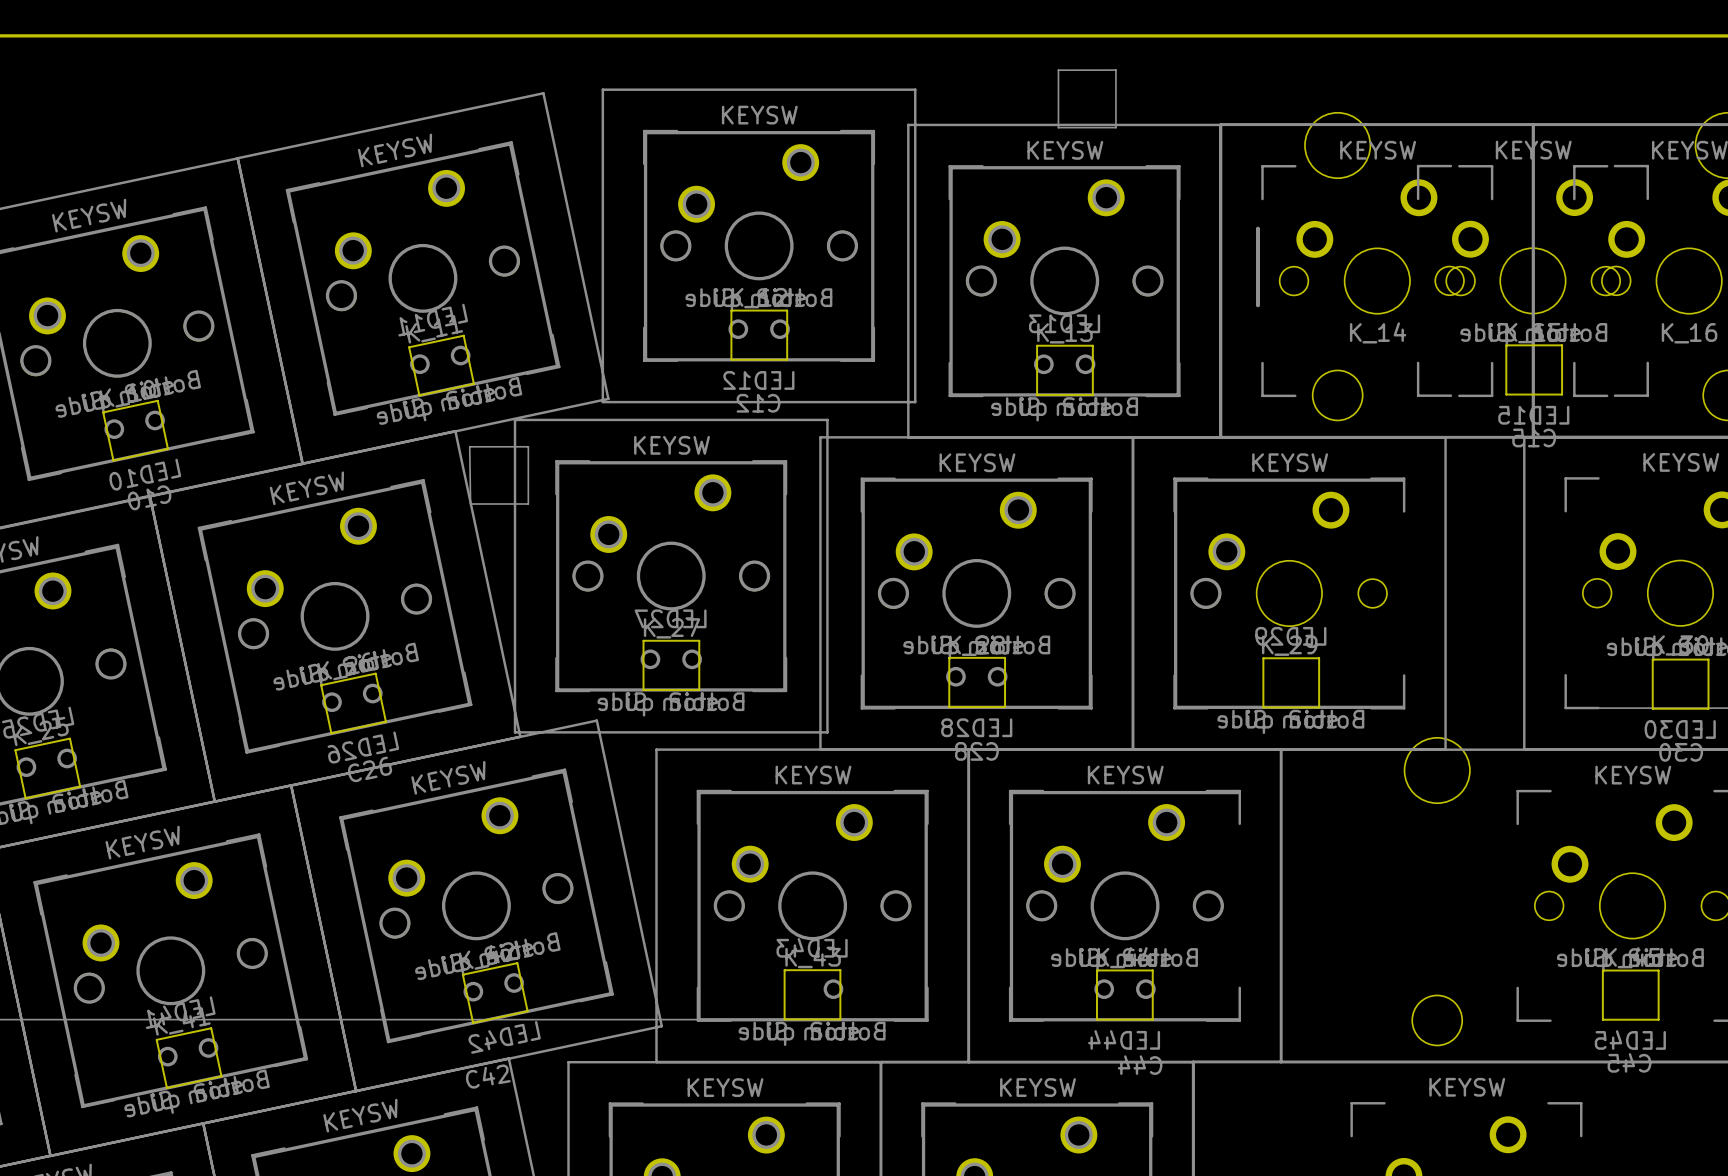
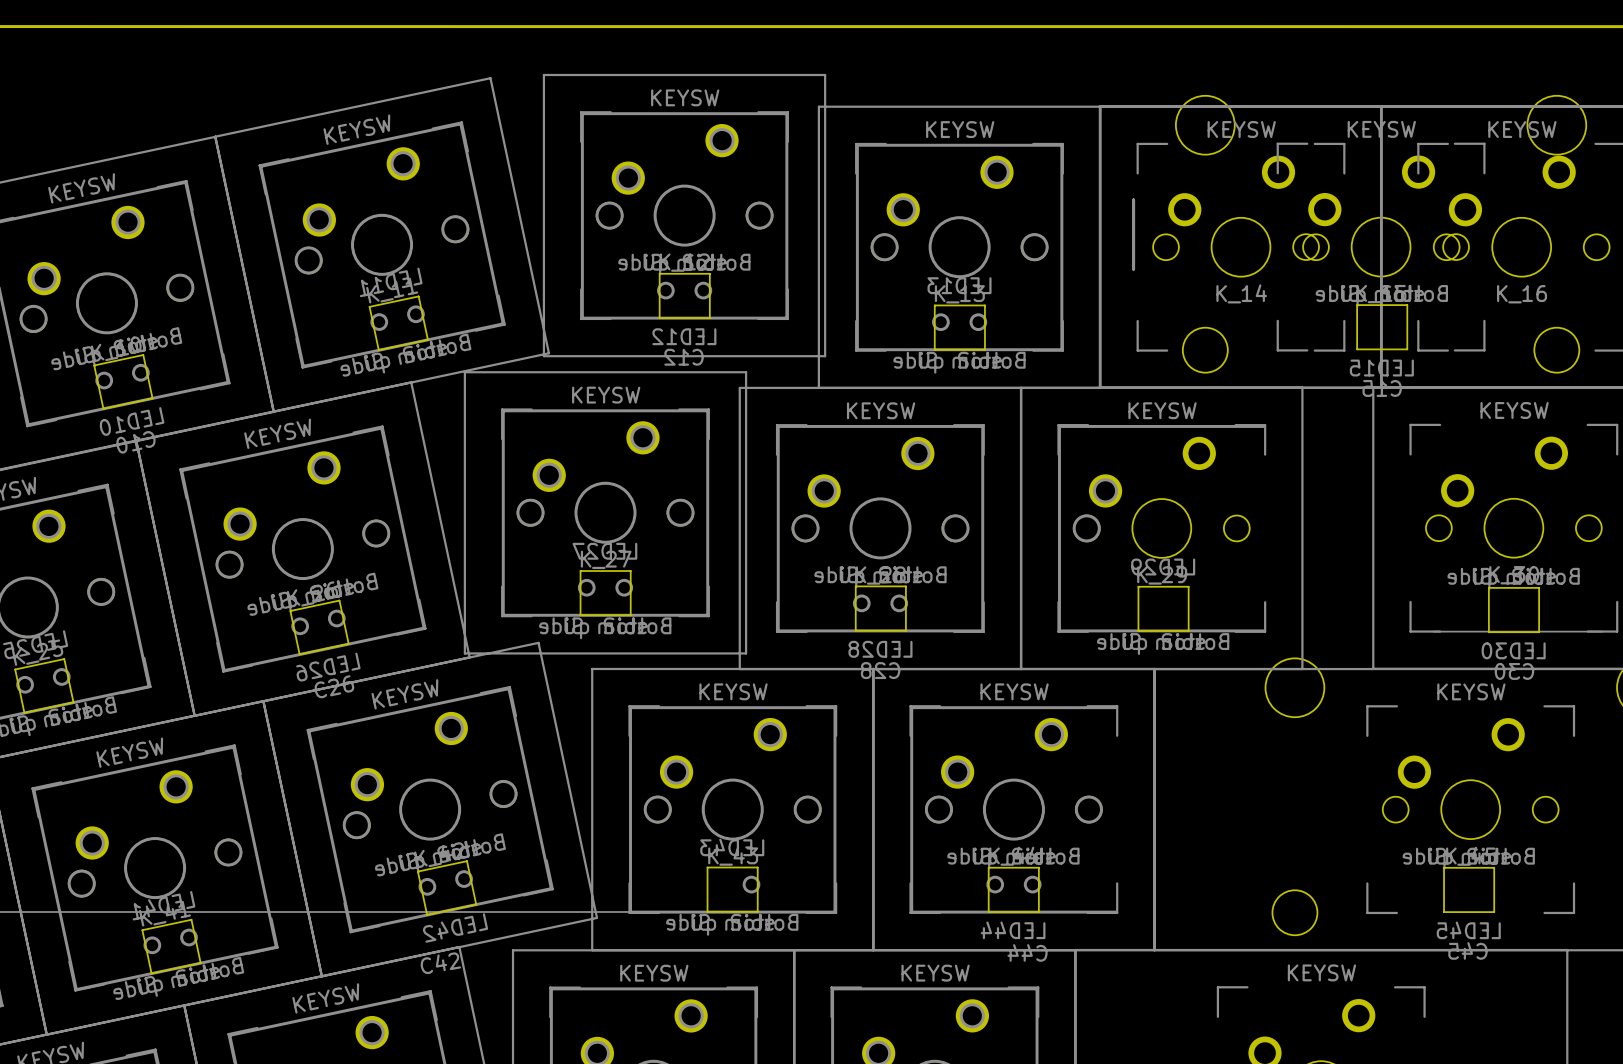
line: (1058, 70) (1115, 70) (1115, 127) (1058, 127) (1058, 70) -> none
line: (469, 446) (470, 504) (528, 504) (528, 446) (469, 446) -> none

